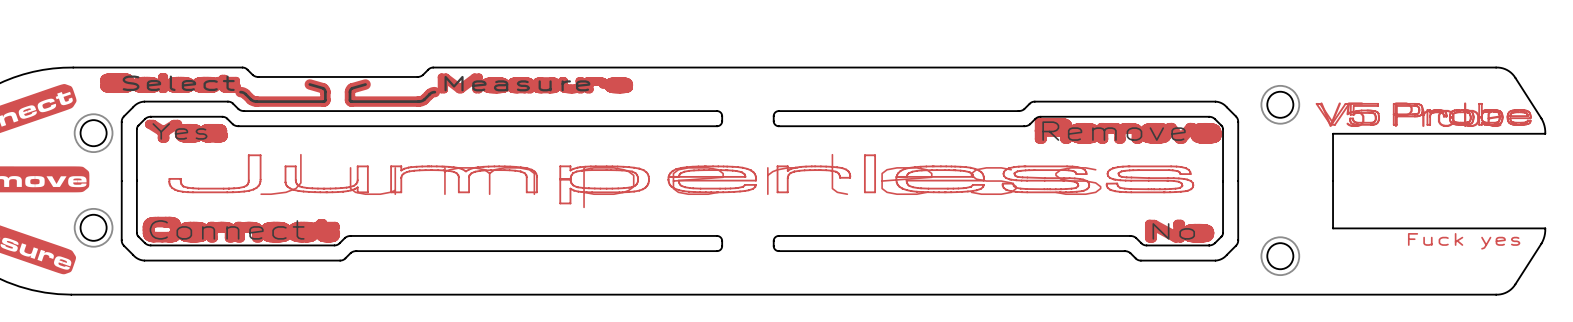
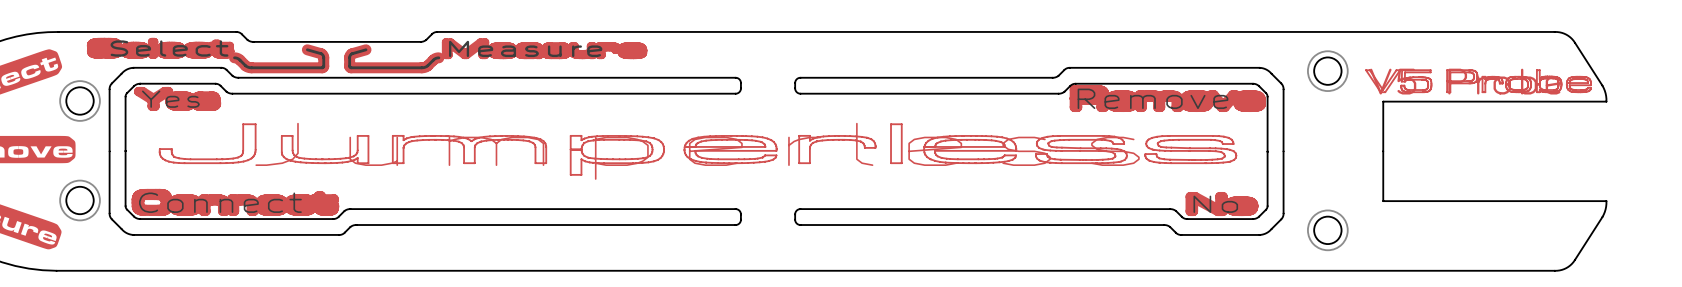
text: Fuck yes (1464, 241) -> none

